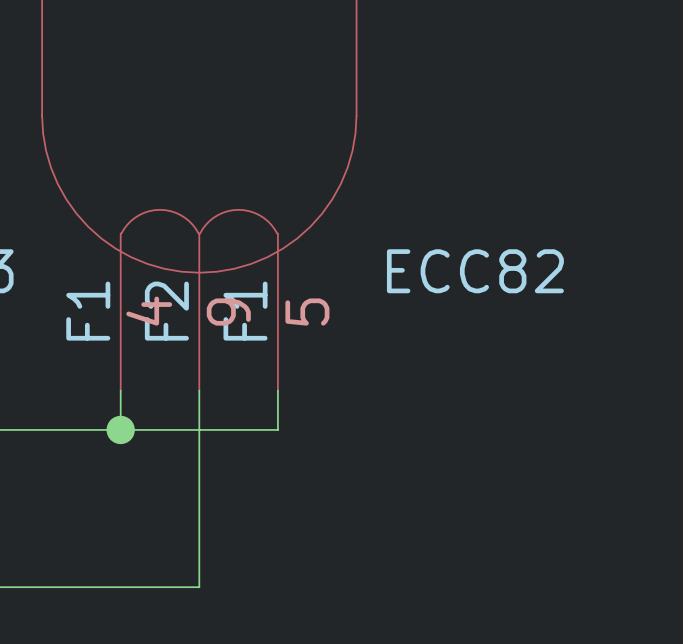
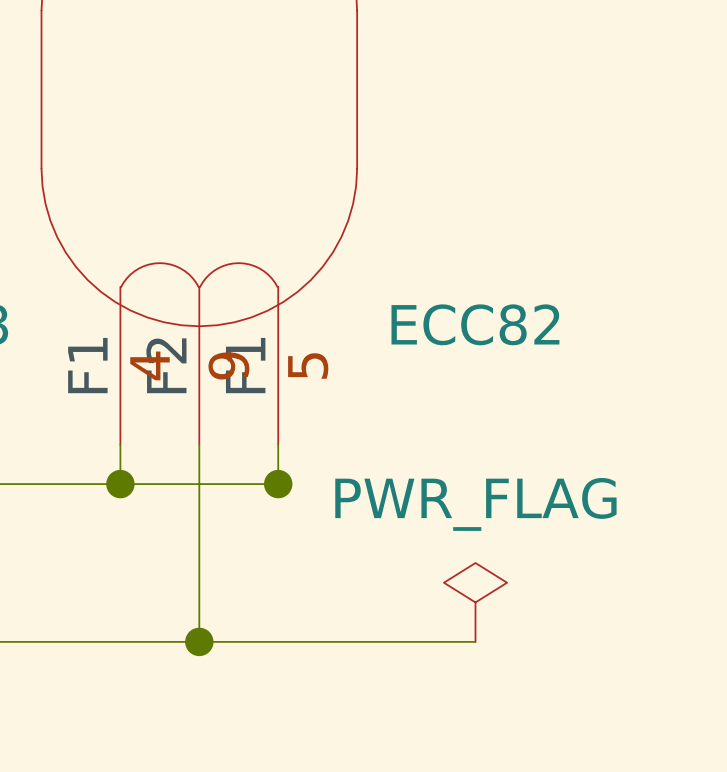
junction: none -> (278, 484)
power symbol: none -> PWR_FLAG (475, 602)
wire: none -> (199, 641) (475, 641)
junction: none -> (199, 641)

